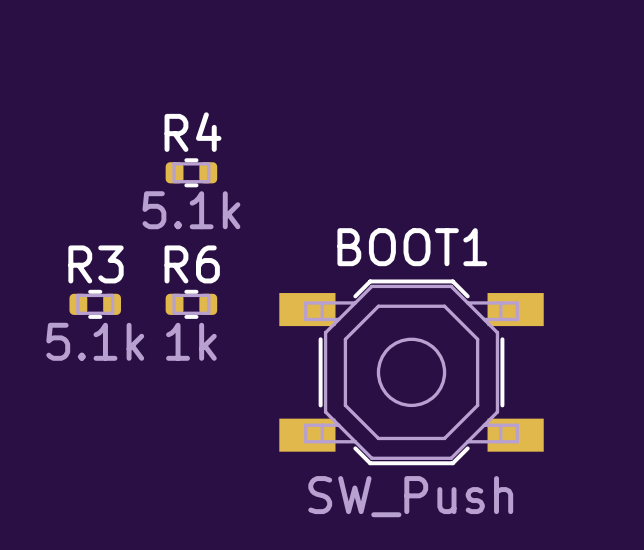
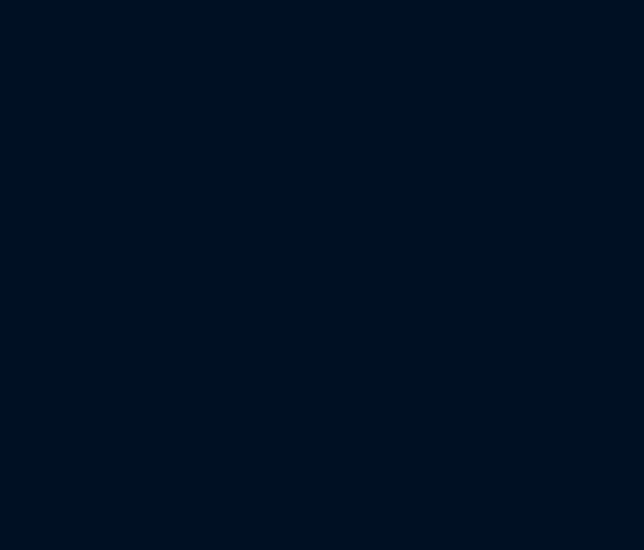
R4: 5.1k (191, 172) -> none
R3: 5.1k (95, 304) -> none
R6: 1k (191, 304) -> none
BOOT1: SW_Push (411, 372) -> none

